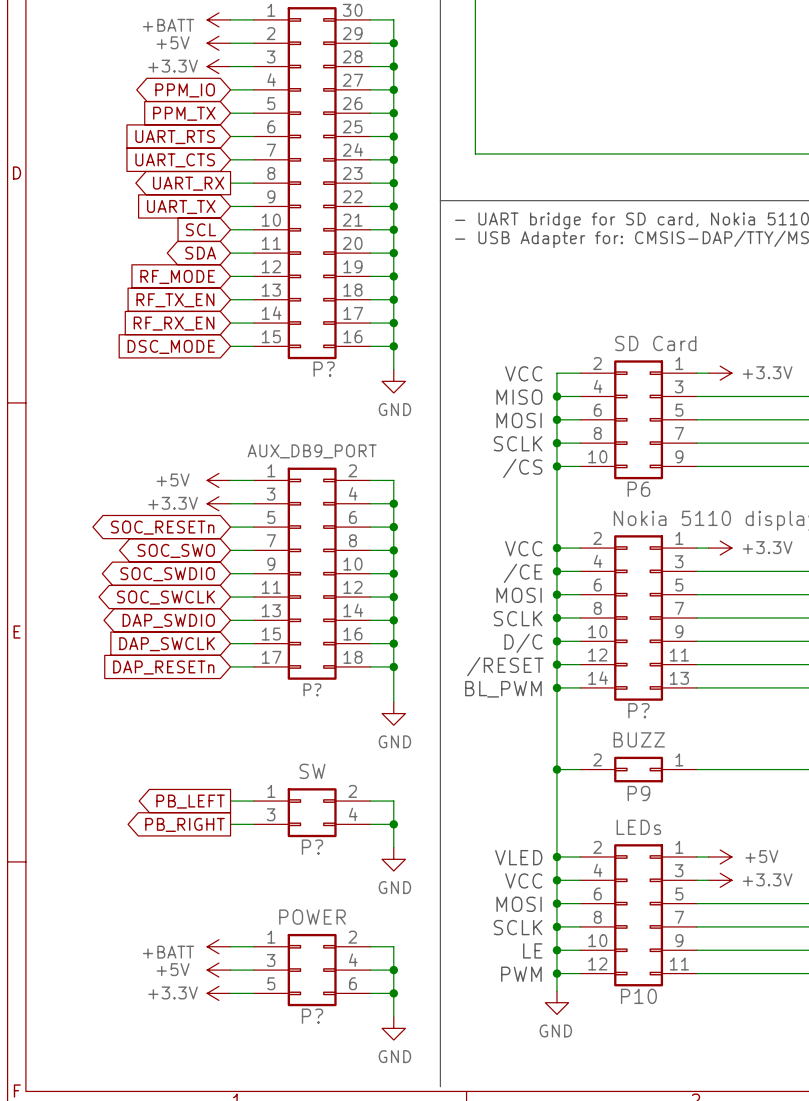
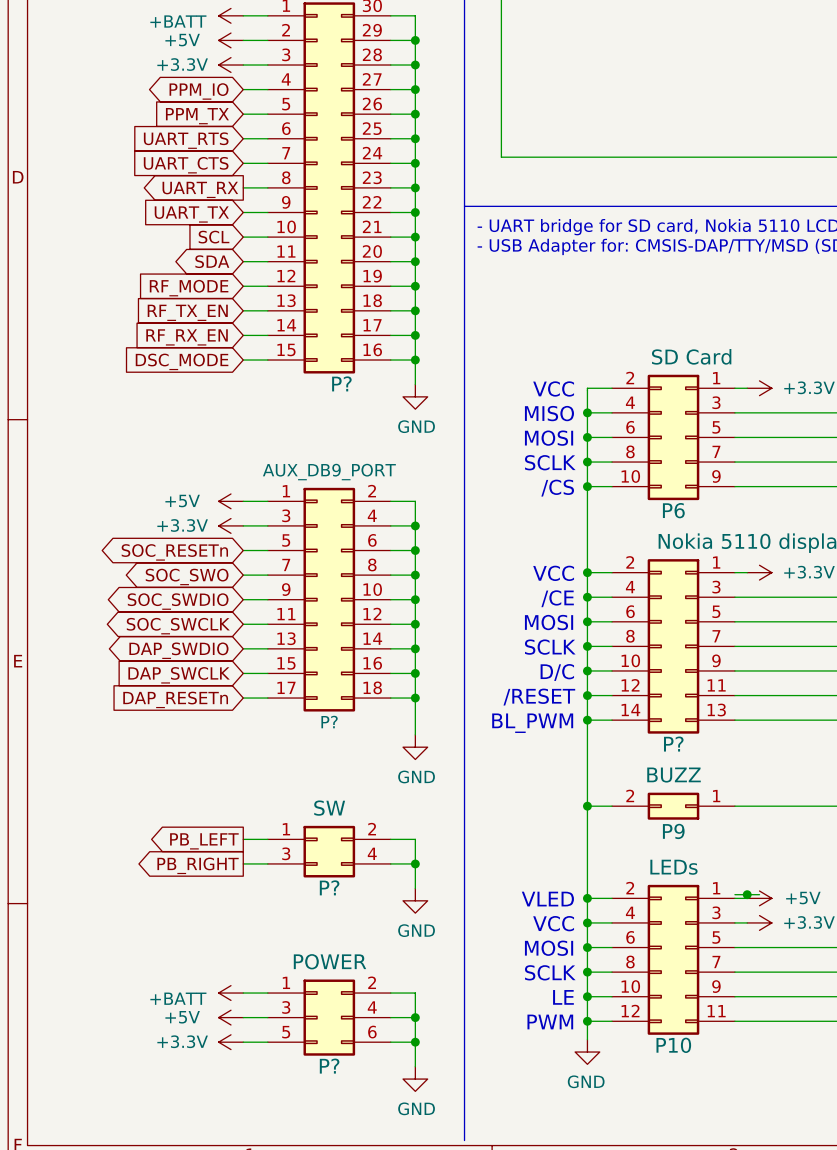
wire: none -> (734, 894) (759, 894)
junction: none -> (747, 894)

